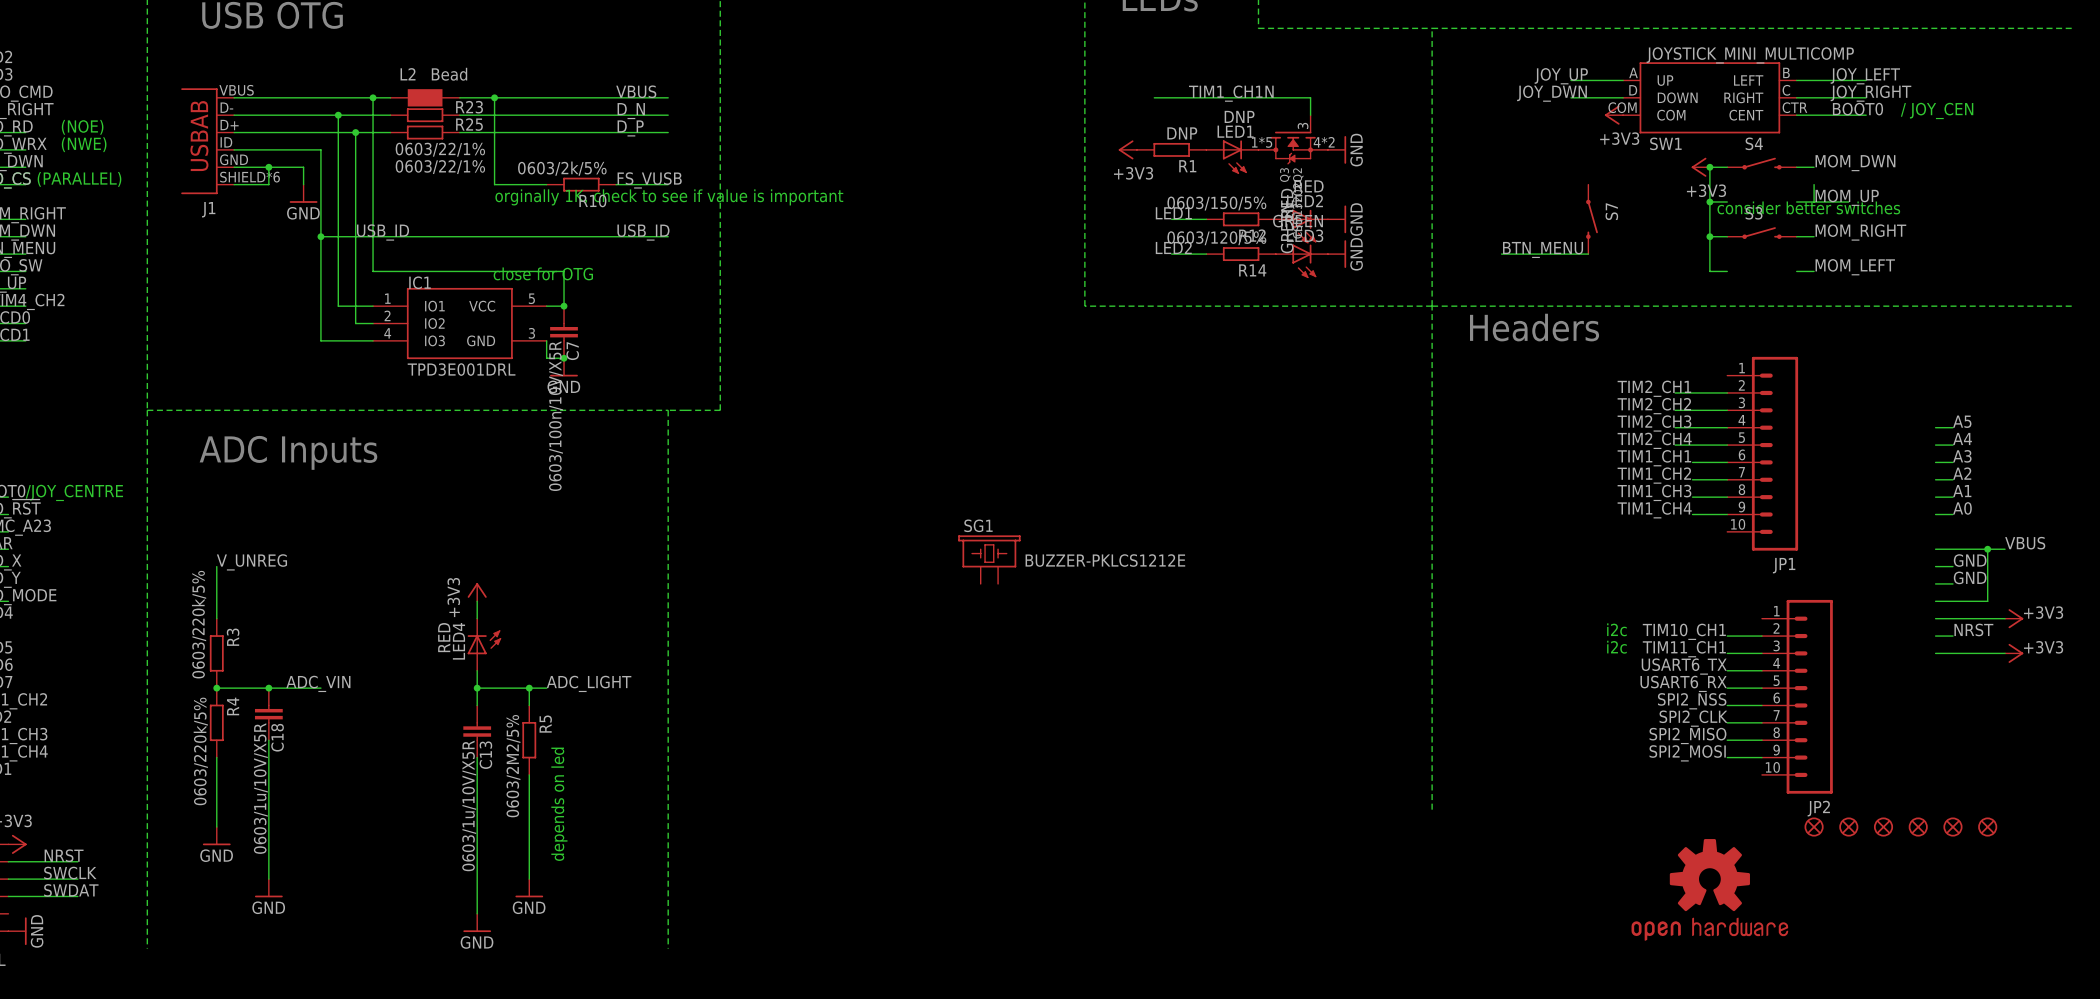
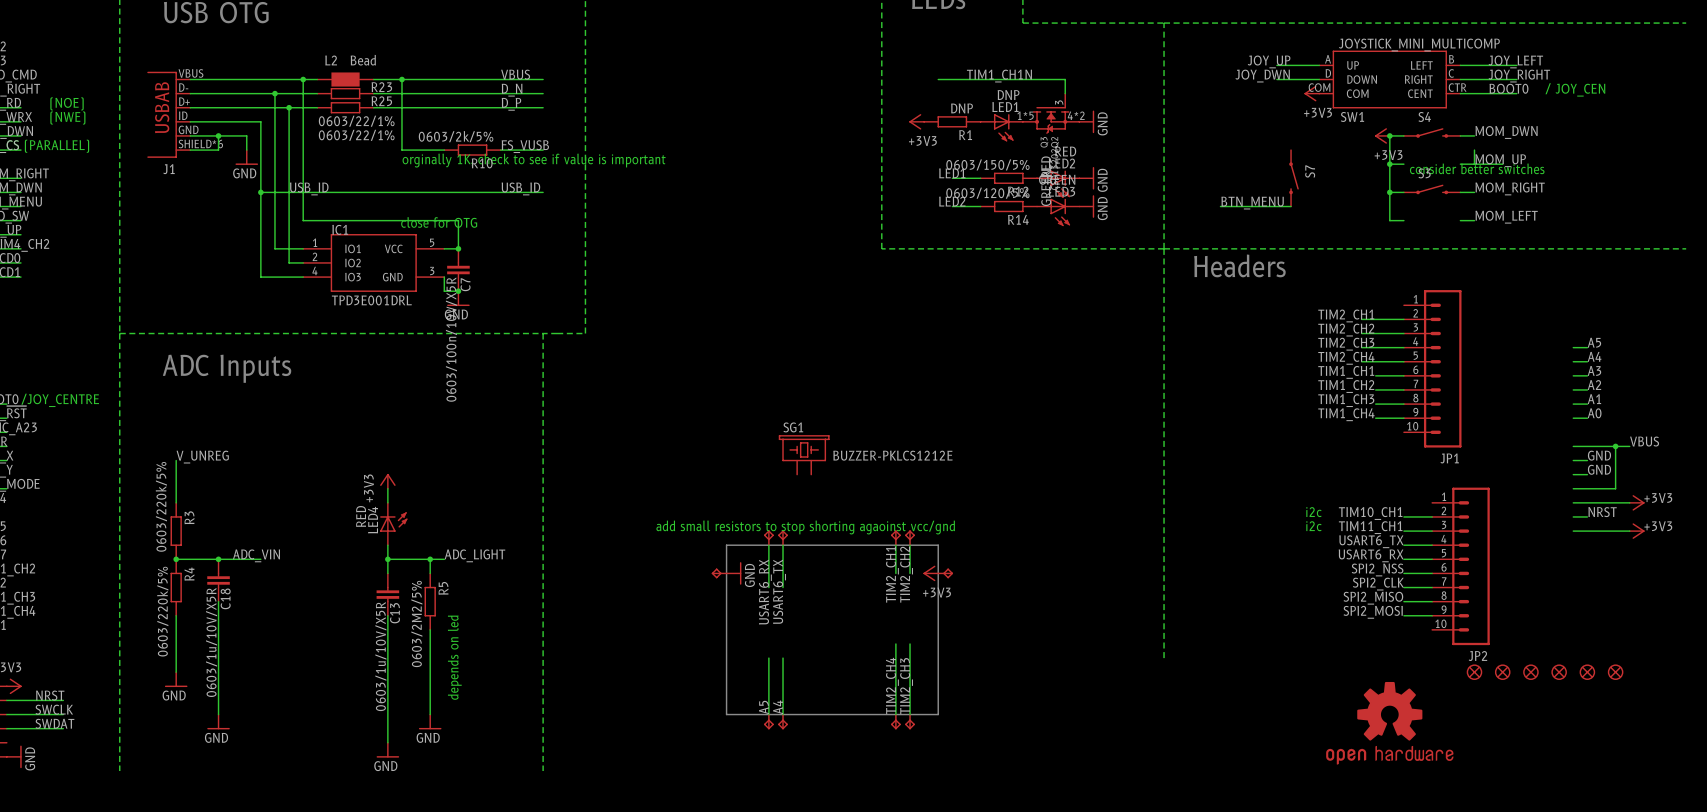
text: none -> add small resistors to stop shorting agaoinst vcc/gnd (805, 527)
part: none -> (768, 537)
part: none -> (783, 537)
part: none -> (895, 537)
part: none -> (910, 537)
line: none -> (726, 545) (938, 545) (938, 714) (726, 714) (726, 545)
wire: none -> (768, 545) (768, 587)
wire: none -> (783, 545) (783, 587)
wire: none -> (895, 545) (895, 573)
wire: none -> (910, 545) (910, 573)
part: none -> (719, 573)
power symbol: none -> GND (733, 573)
power symbol: none -> +3V3 (930, 573)
part: none -> (945, 573)
label: none -> TIM2_CH1 (892, 574)
label: none -> TIM2_CH2 (906, 574)
label: none -> USART6_RX (765, 592)
label: none -> USART6_TX (779, 591)
wire: none -> (895, 643) (895, 714)
wire: none -> (910, 643) (910, 714)
wire: none -> (768, 658) (768, 714)
wire: none -> (783, 658) (783, 714)
label: none -> TIM2_CH4 (892, 685)
label: none -> TIM2_CH3 (906, 686)
label: none -> A5 (763, 707)
label: none -> A4 (778, 707)
part: none -> (768, 721)
part: none -> (783, 721)
part: none -> (895, 721)
part: none -> (910, 721)

